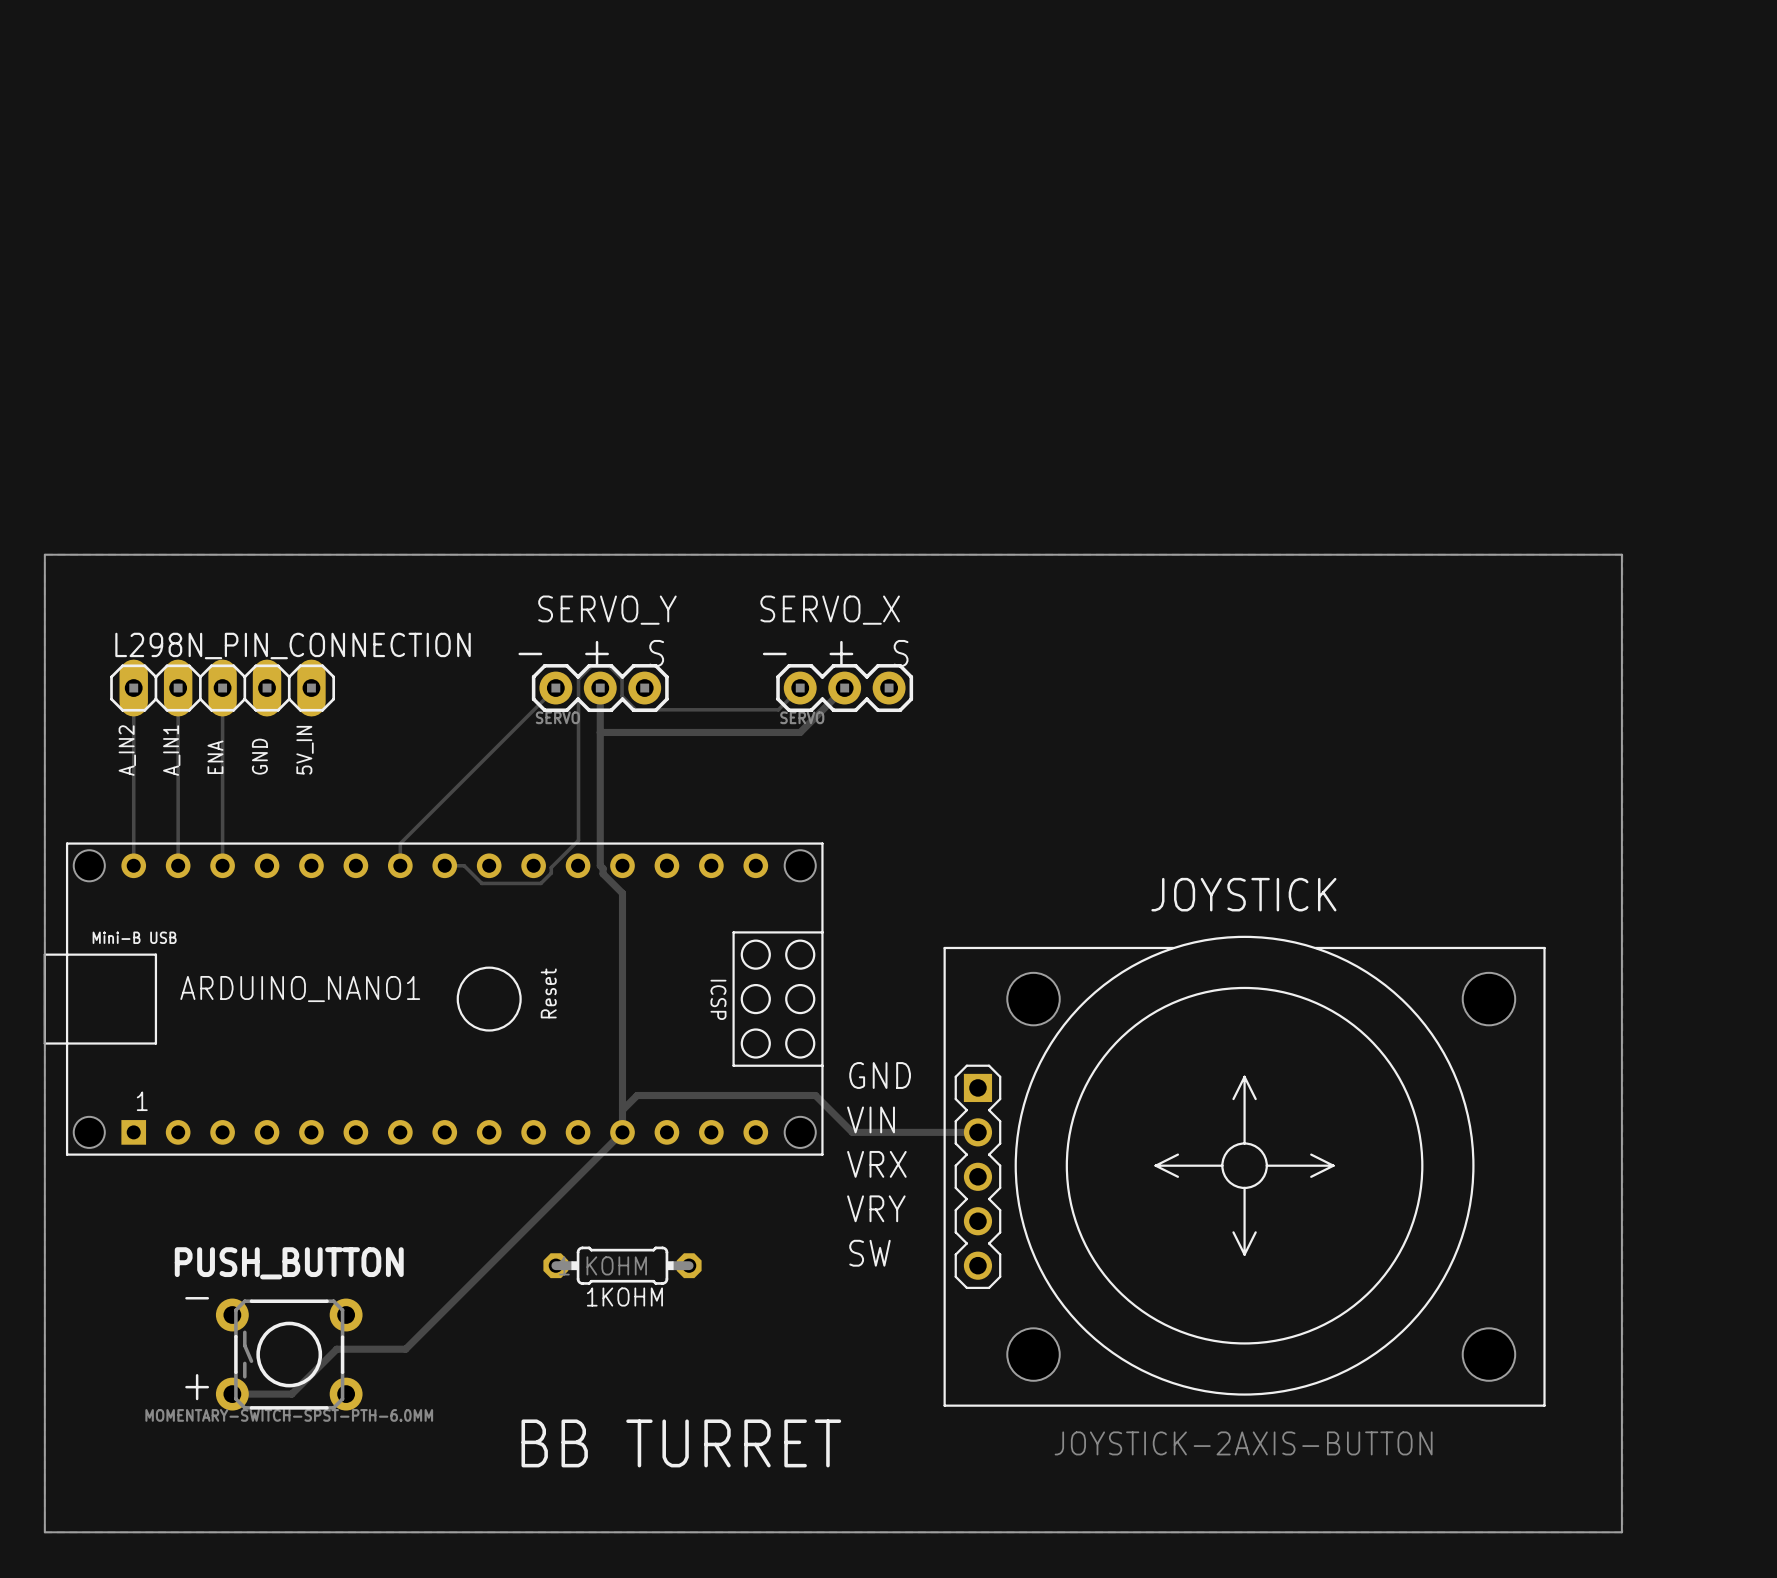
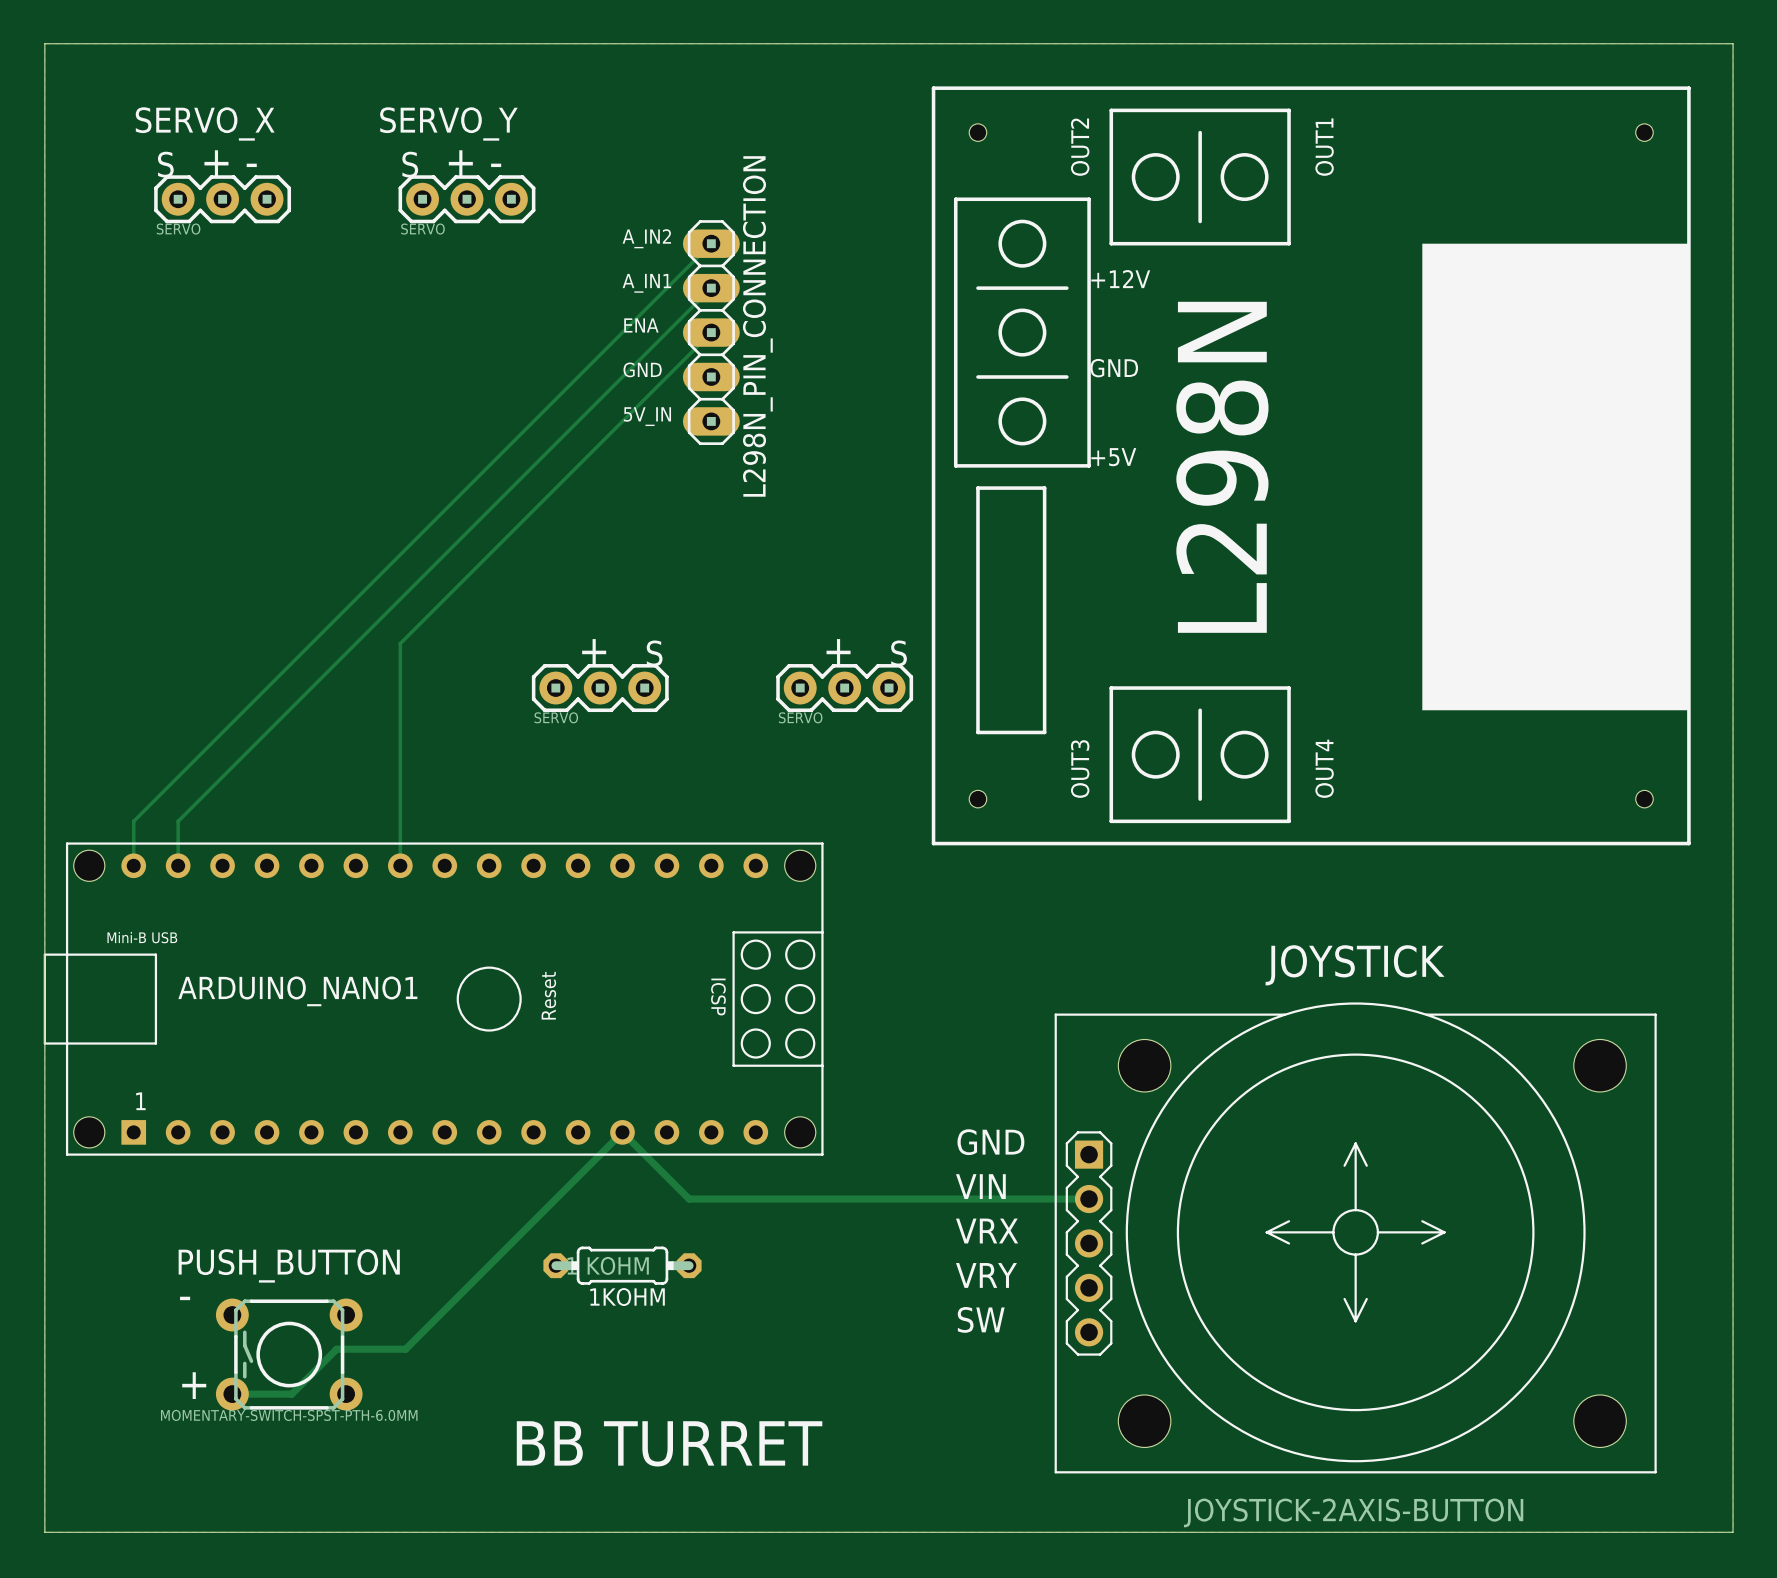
line: none -> (933, 88) (1688, 88) (1688, 843) (933, 843) (933, 88)
line: none -> (1111, 110) (1289, 110) (1289, 243) (1111, 243) (1111, 110)
text: none -> SERVO_X (205, 123)
text: none -> SERVO_Y (448, 123)
hole: none -> (977, 132)
line: none -> (1200, 132) (1200, 221)
hole: none -> (1644, 132)
text: none -> OUT2 (1080, 147)
text: none -> OUT1 (1324, 147)
drawing: none -> [1131, 153, 1180, 202]
drawing: none -> [1220, 153, 1269, 202]
text: none -> S (165, 164)
text: none -> S (410, 164)
text: none -> + (216, 163)
text: none -> - (251, 165)
text: none -> + (460, 163)
text: none -> - (496, 165)
part: none -> SERVO (222, 199)
part: none -> SERVO (466, 199)
line: none -> (955, 199) (955, 465) (1089, 465) (1089, 199) (955, 199)
drawing: none -> [998, 219, 1047, 268]
text: none -> A_IN2 (646, 238)
drawing: none -> [1422, 243, 1689, 711]
text: none -> +12V (1120, 279)
text: none -> A_IN1 (646, 283)
line: none -> (977, 288) (1066, 288)
drawing: none -> [998, 308, 1047, 357]
text: none -> ENA (641, 325)
text: none -> GND (1114, 368)
text: none -> GND (642, 369)
line: none -> (977, 377) (1066, 377)
drawing: none -> [998, 397, 1047, 446]
text: none -> 5V_IN (647, 416)
text: none -> L298N (1222, 467)
text: none -> +5V (1113, 457)
line: none -> (977, 488) (1044, 488) (1044, 732) (977, 732) (977, 488)
board edge: (44, 554) (1621, 554) (1621, 1532) -> (44, 554) (44, 43) (1733, 43) (1733, 1532) (1621, 1532)
text: SERVO_Y (607, 610) -> none
text: SERVO_X (830, 610) -> none
L298N_PIN_CONNECTION name position: L298N_PIN_CONNECTION (293, 645) -> L298N_PIN_CONNECTION (757, 326)
text: - (530, 653) -> none
text: - (774, 653) -> none
track: (133, 688) (133, 821) -> (711, 243) (133, 821)
track: (178, 688) (178, 821) -> (711, 288) (178, 821)
track: (222, 688) (222, 865) -> none
L298N_PIN_CONNECTION rotation: 0° (222, 688) -> 90° clockwise (711, 332)
L298N_PIN_CONNECTION position: (222, 688) -> (711, 332)
track: (555, 688) (400, 843) -> (711, 332) (400, 643) (400, 843)
track: (600, 688) (600, 865) (603, 868) (603, 873) (622, 893) (622, 1132) -> (1089, 1199) (689, 1199) (622, 1132)
track: (800, 688) (778, 709) (635, 709) (622, 696) (622, 679) (609, 666) (591, 666) (578, 679) (578, 840) (551, 867) (551, 873) (540, 883) (481, 883) (464, 865) (444, 865) -> none
track: (844, 688) (800, 732) (600, 732) -> none
line: none -> (1111, 688) (1111, 821) (1289, 821) (1289, 688) (1111, 688)
line: none -> (1200, 710) (1200, 799)
drawing: none -> [1131, 730, 1180, 779]
drawing: none -> [1220, 730, 1269, 779]
text: A_IN2 (127, 750) -> none
text: A_IN1 (171, 750) -> none
text: 5V_IN (305, 750) -> none
text: GND (259, 756) -> none
text: ENA (215, 757) -> none
text: none -> OUT3 (1080, 769)
text: none -> OUT4 (1324, 768)
hole: none -> (977, 799)
hole: none -> (1644, 799)
text position: GND (880, 1075) -> GND (990, 1142)
track: (622, 1110) (637, 1095) (815, 1095) (852, 1132) (977, 1132) -> none
text position: VIN (871, 1119) -> VIN (980, 1186)
text position: VRX (876, 1164) -> VRX (987, 1231)
JOYSTICK position: (1244, 1171) -> (1355, 1237)
text position: VRY (876, 1208) -> VRY (986, 1275)
text position: SW (869, 1253) -> SW (981, 1319)

